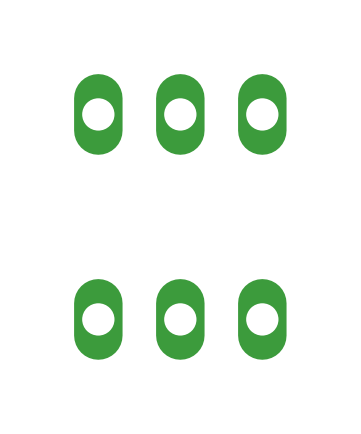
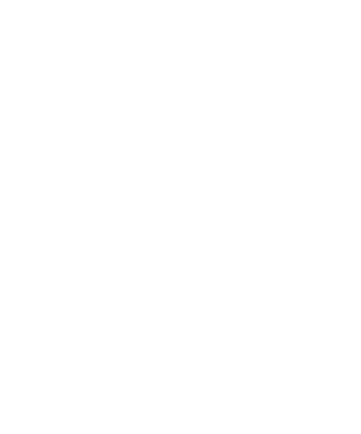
part: (180, 114) -> none
part: (180, 319) -> none

